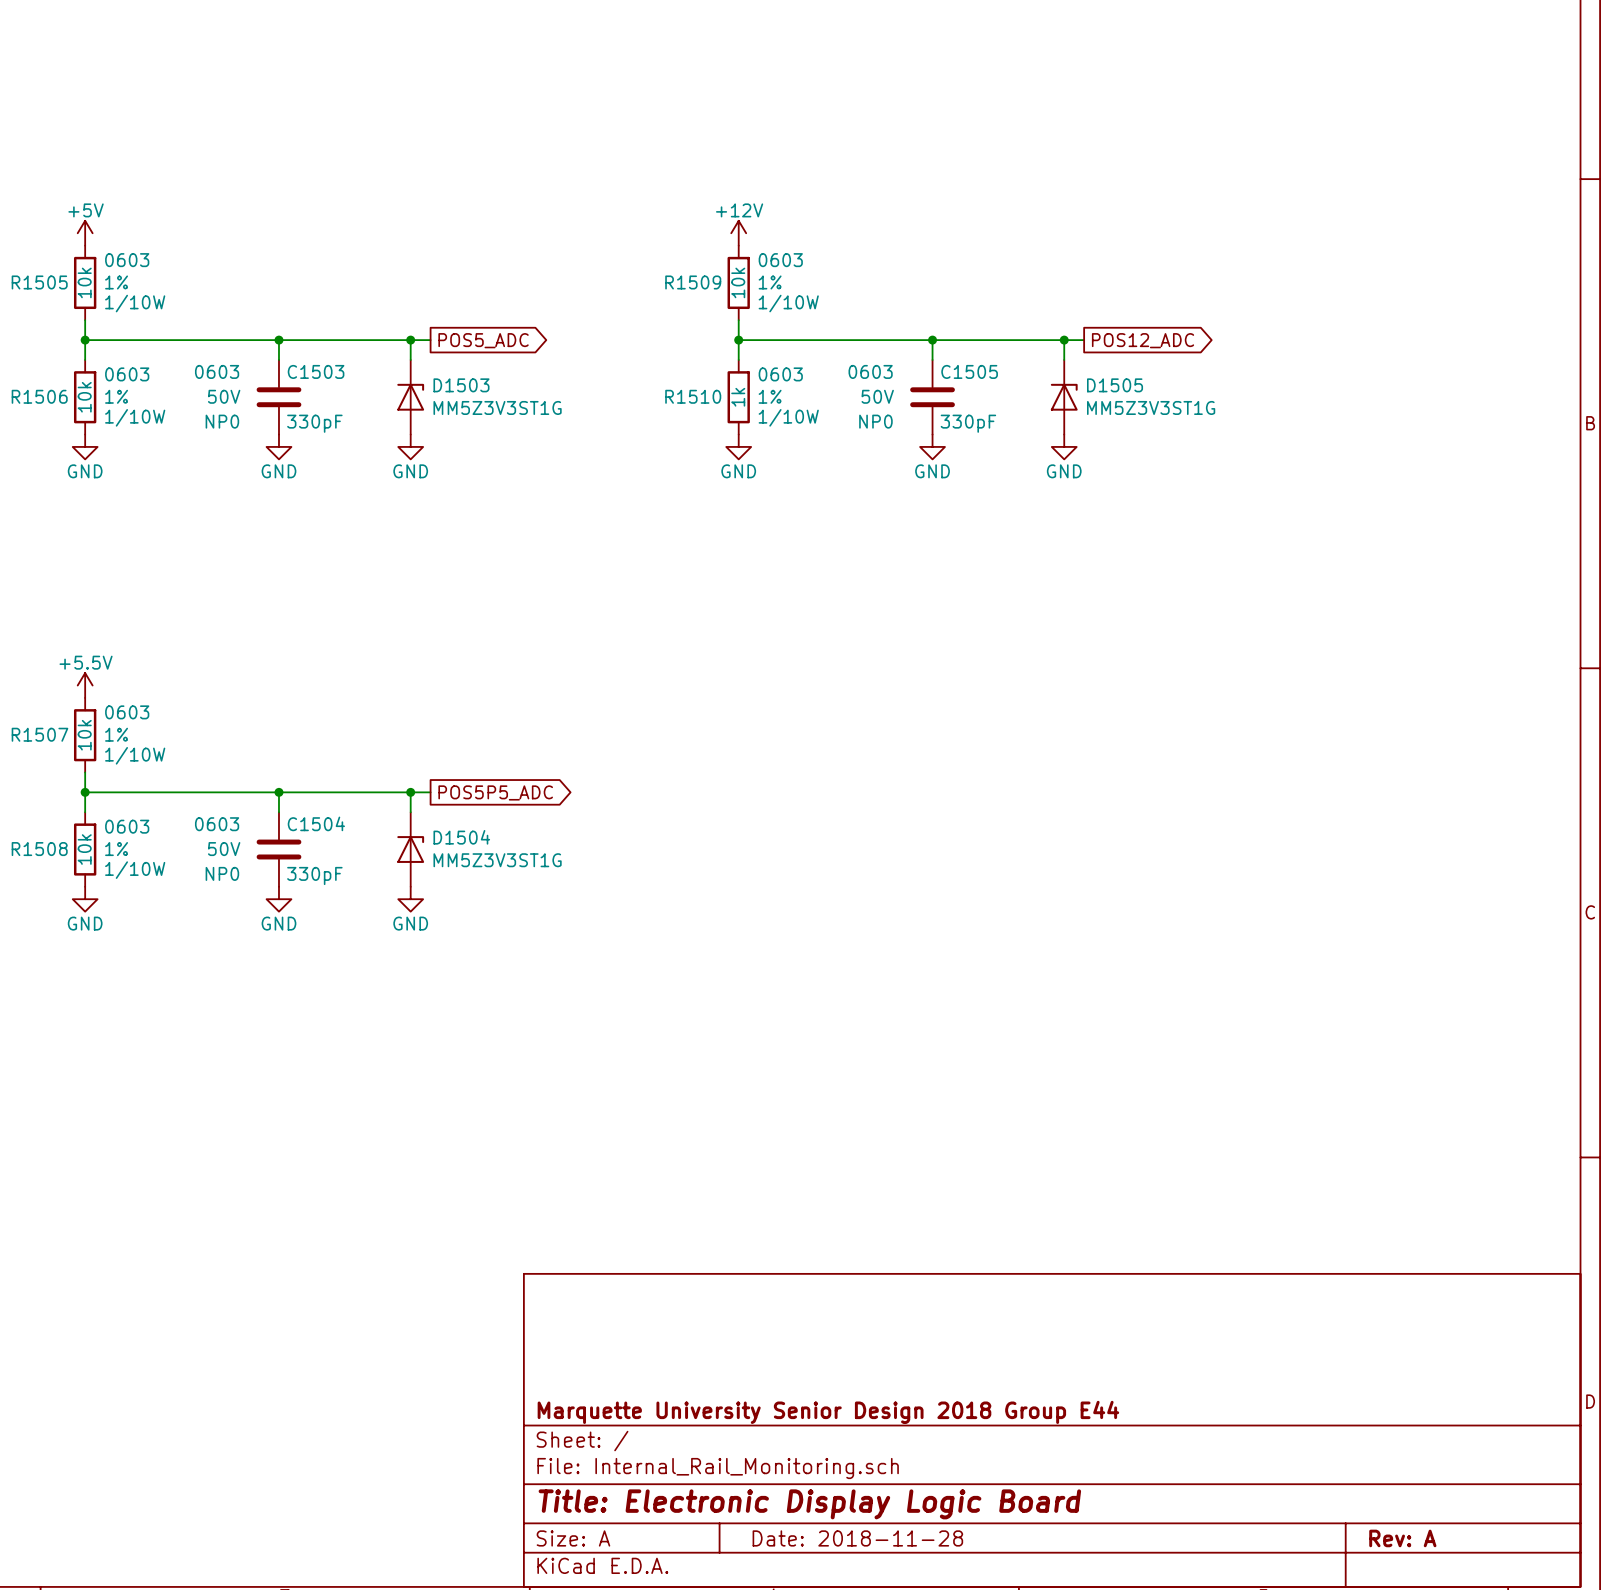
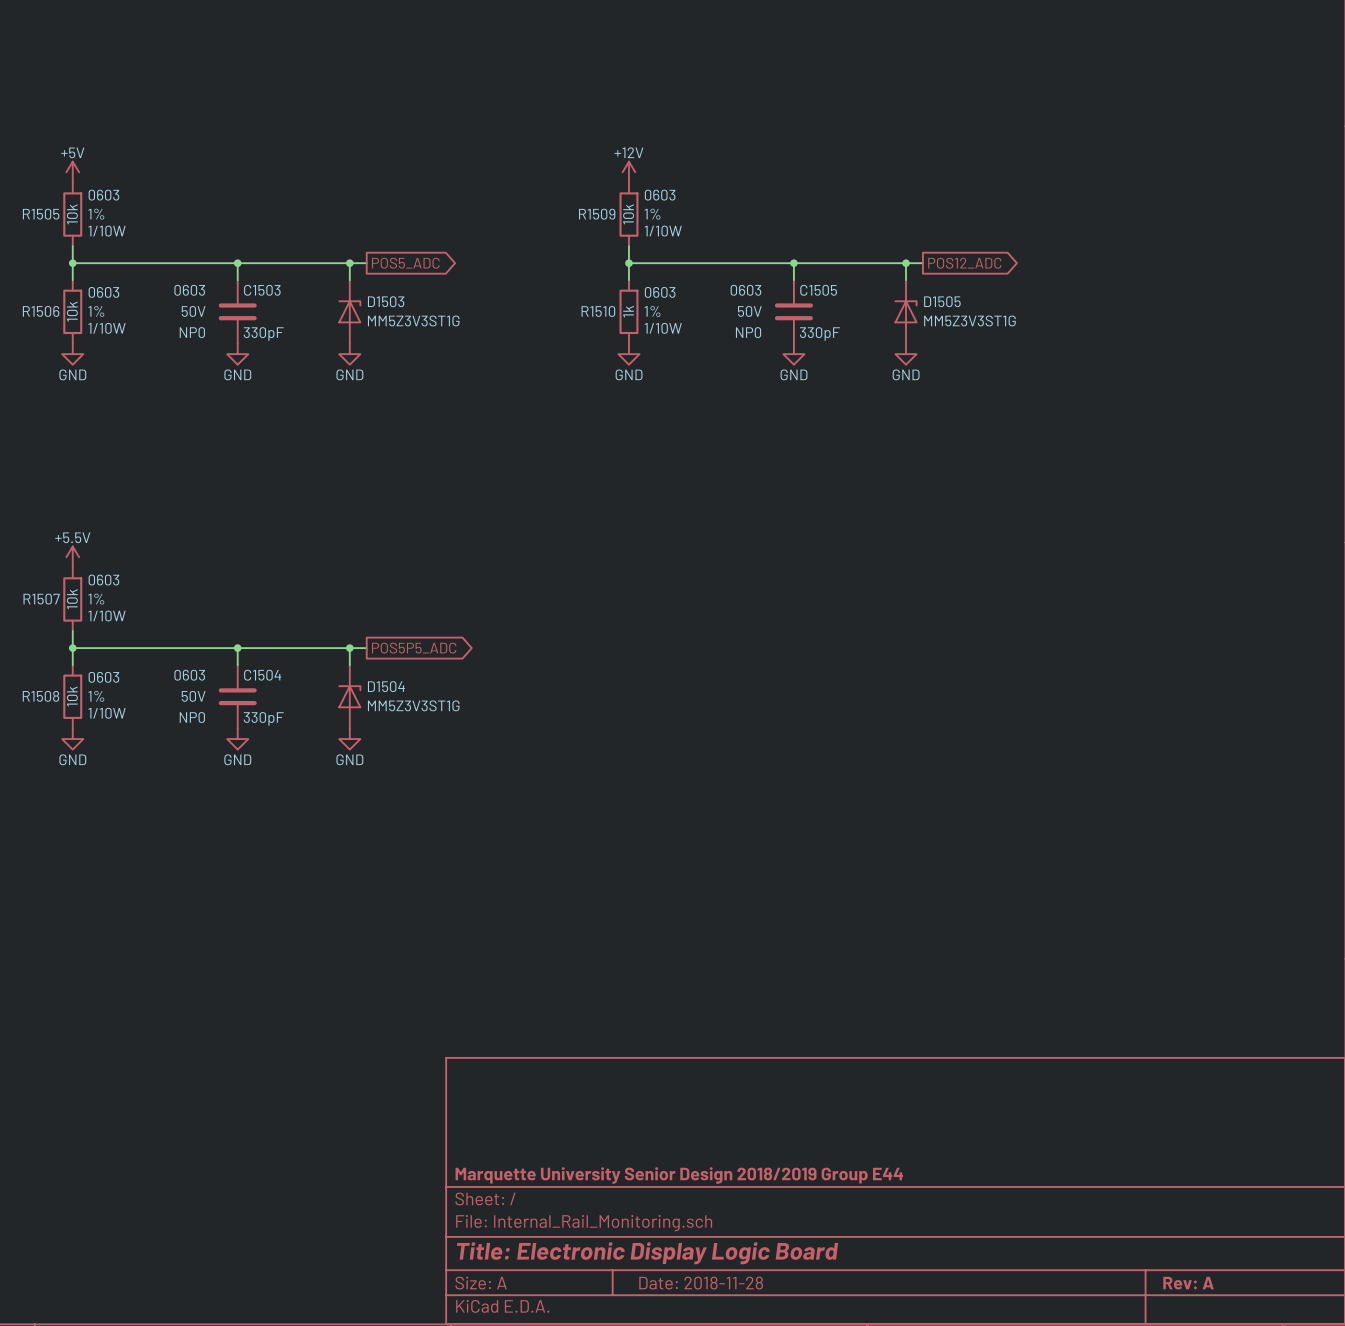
title block: Marquette University Senior Design 2018 Group E44 (828, 1412) -> Marquette University Senior Design 2018/2019 Group E44 (679, 1175)

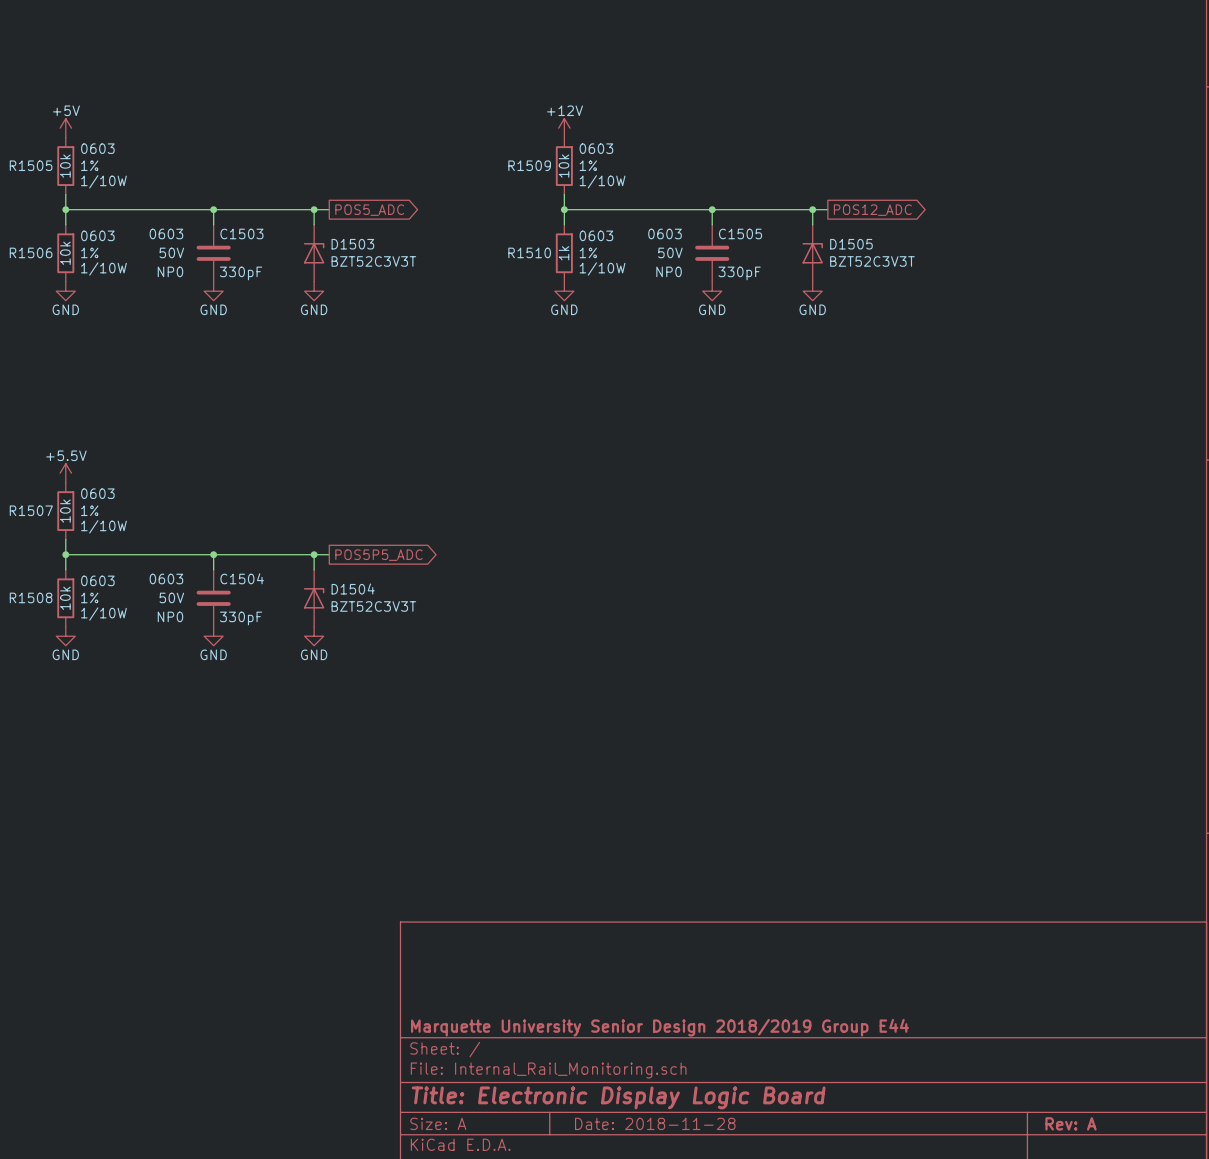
D1503 value: MM5Z3V3ST1G (413, 320) -> BZT52C3V3T (373, 261)
D1505 value: MM5Z3V3ST1G (969, 320) -> BZT52C3V3T (872, 261)
D1504 value: MM5Z3V3ST1G (413, 705) -> BZT52C3V3T (373, 606)

